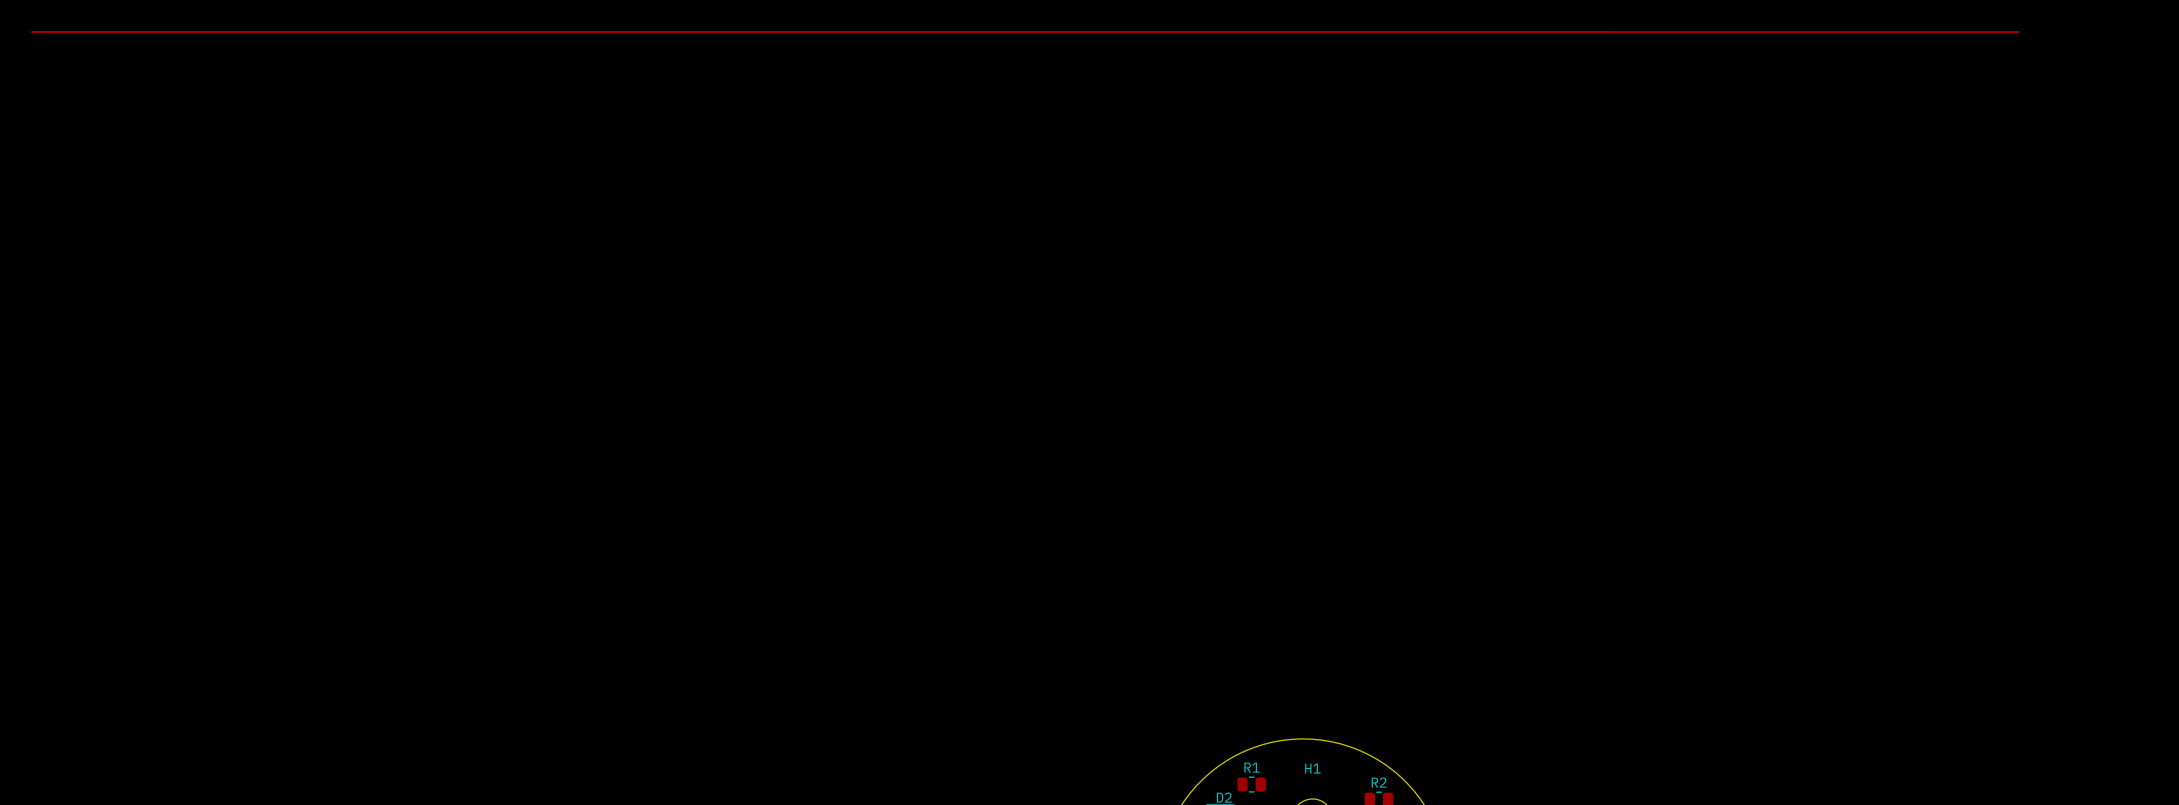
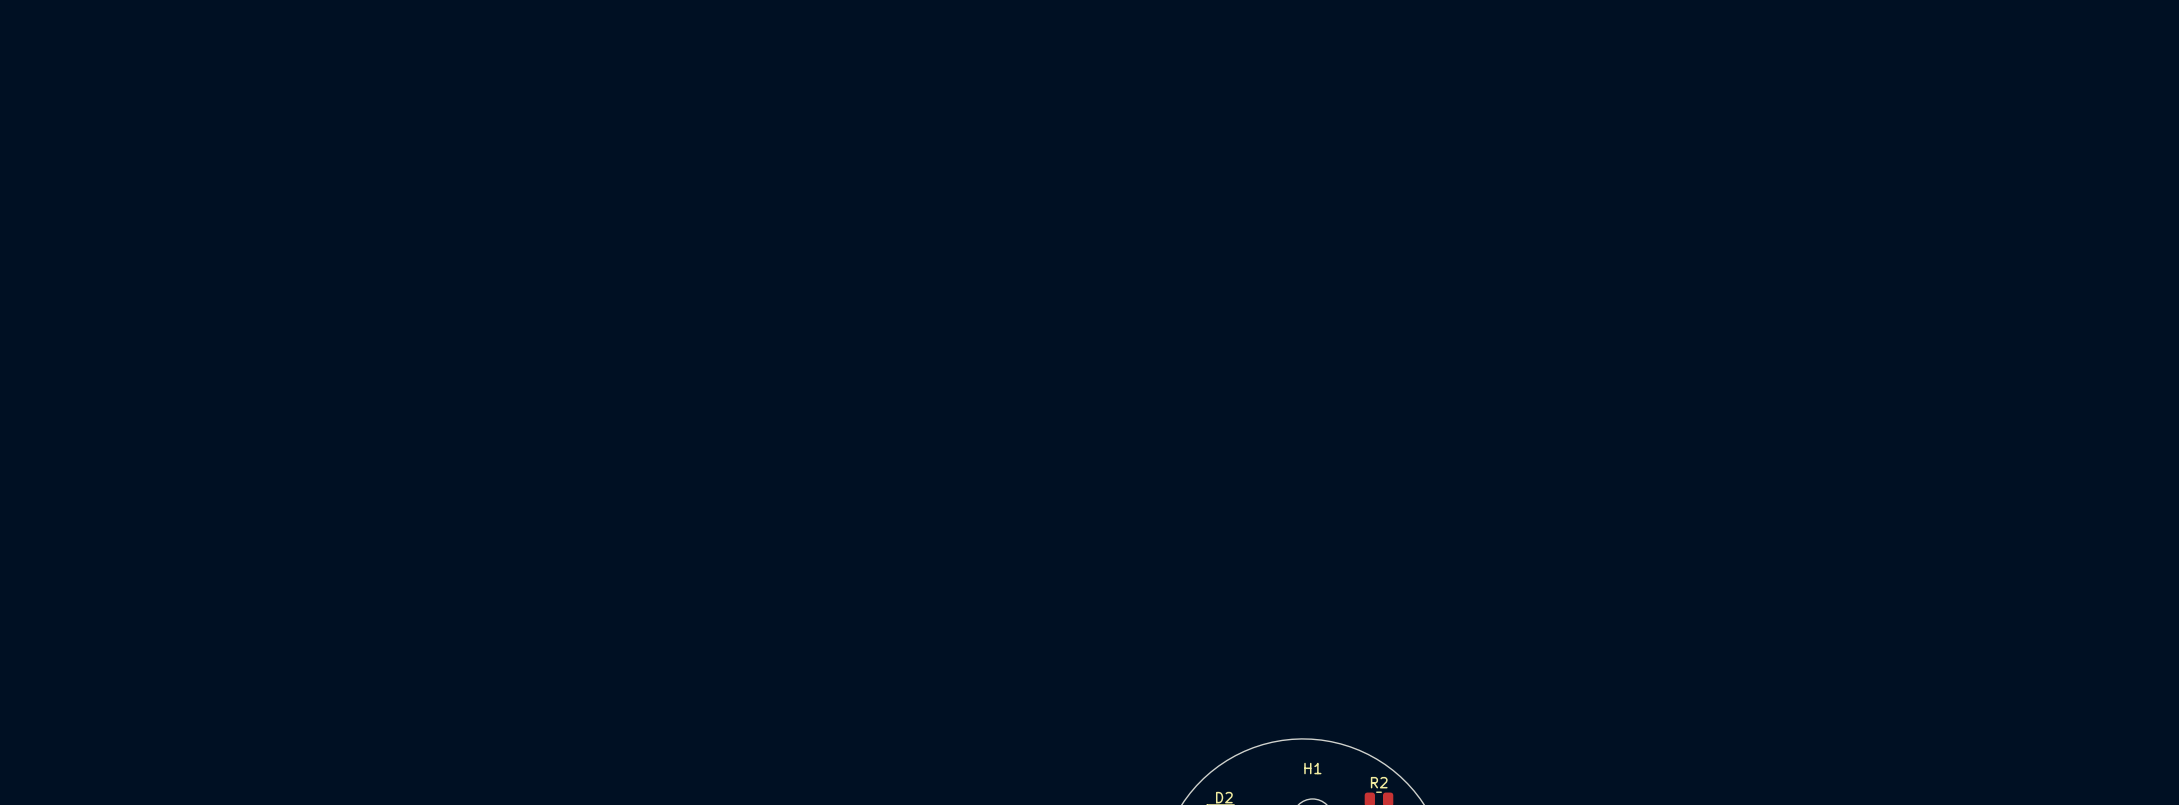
top track: (1611, 32) (32, 32) (2018, 32) -> none
R1: (1251, 784) -> none

